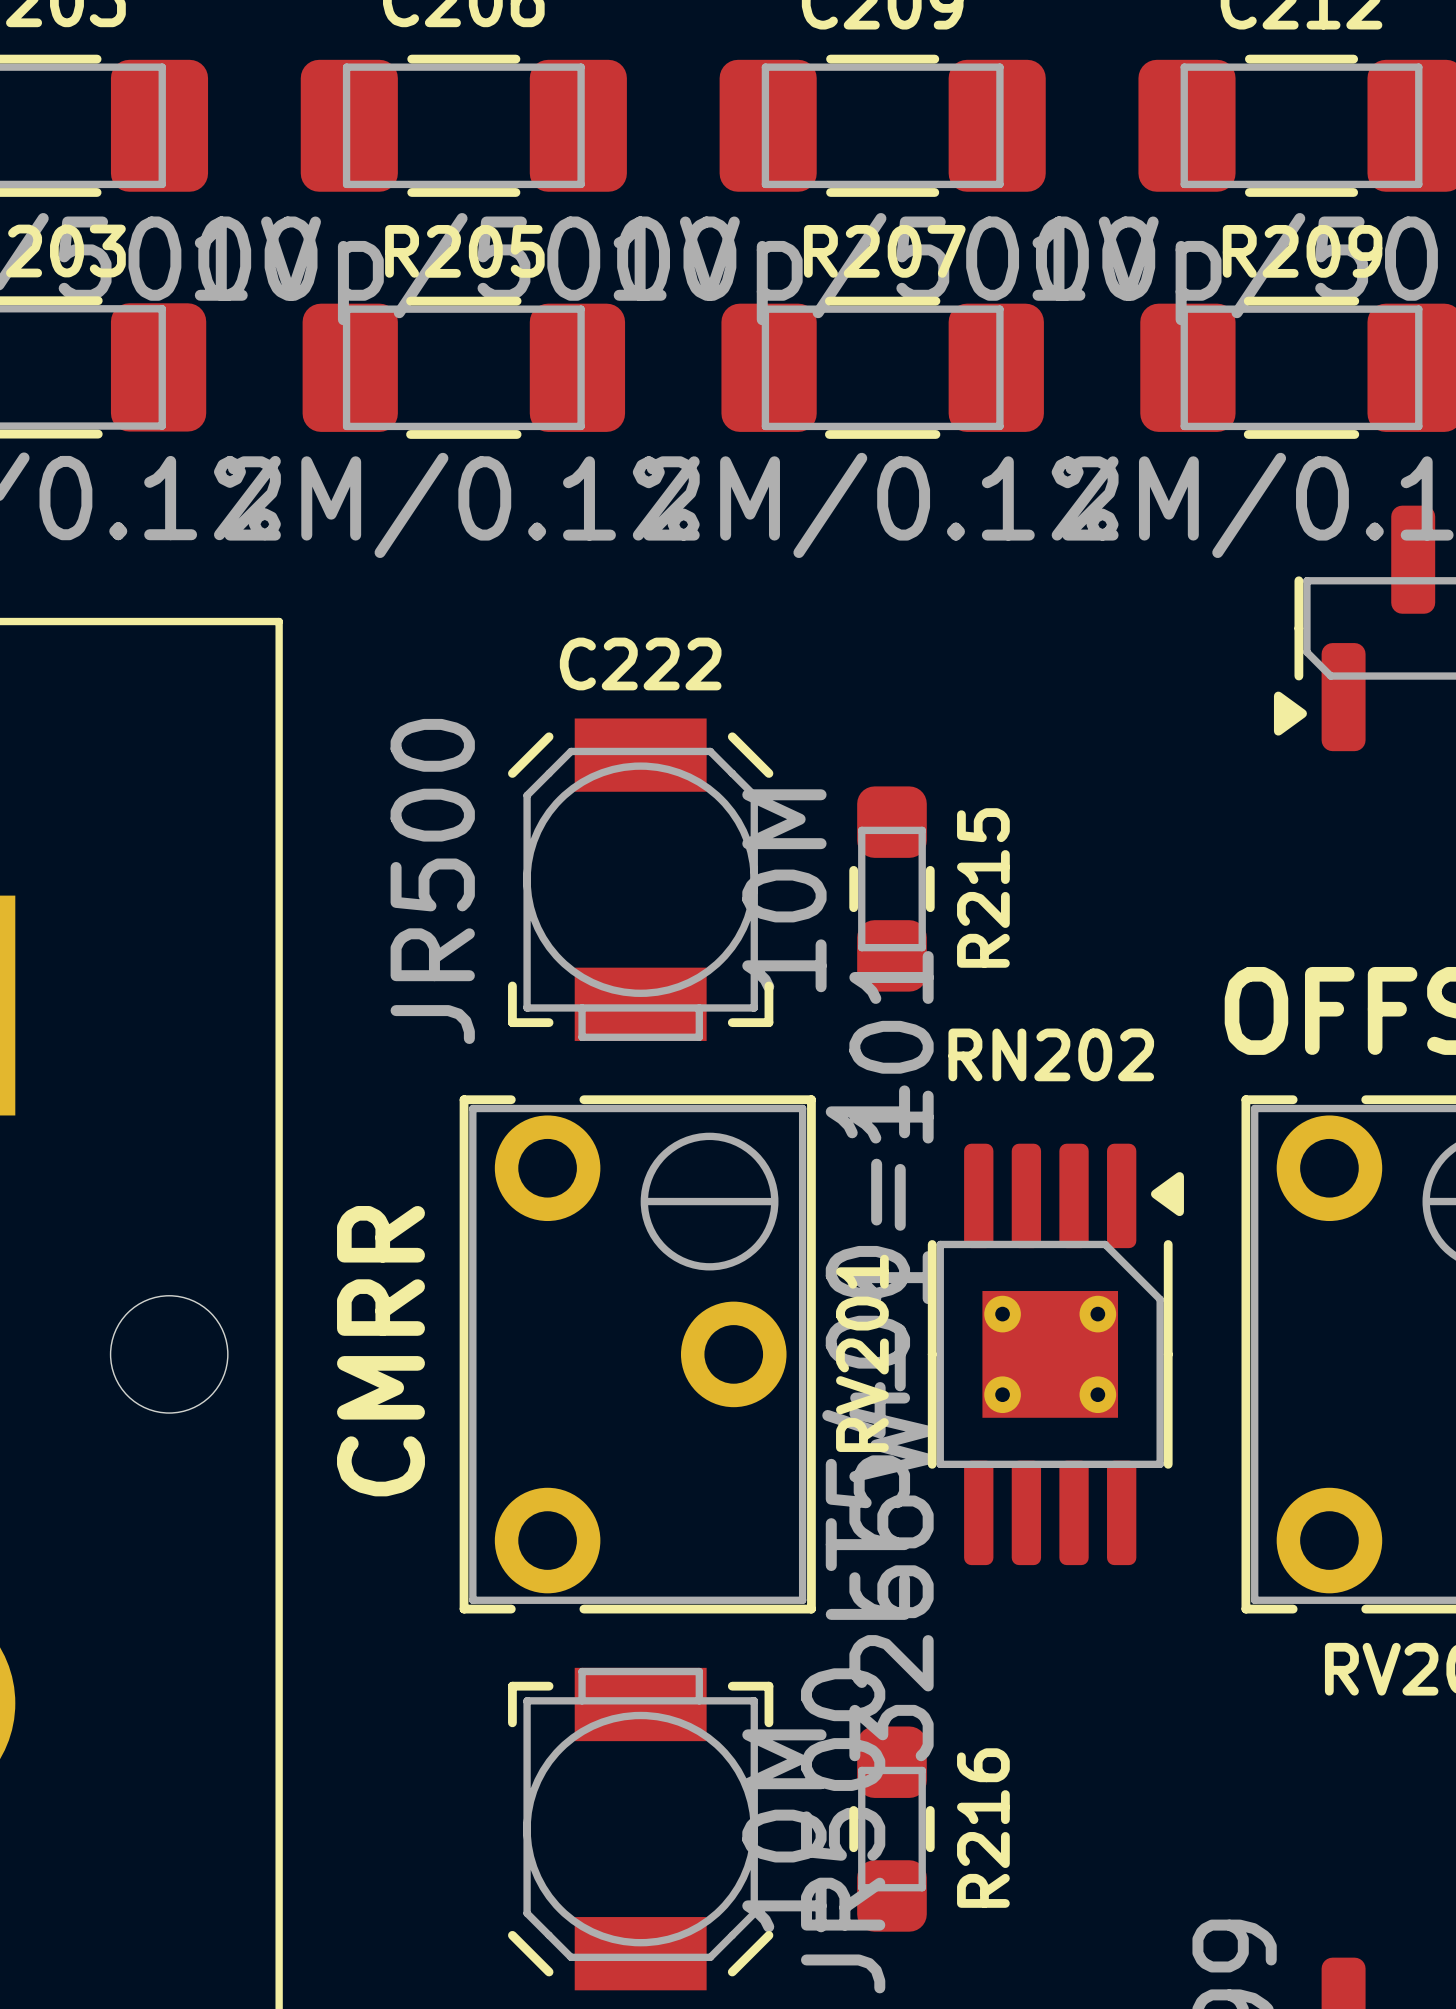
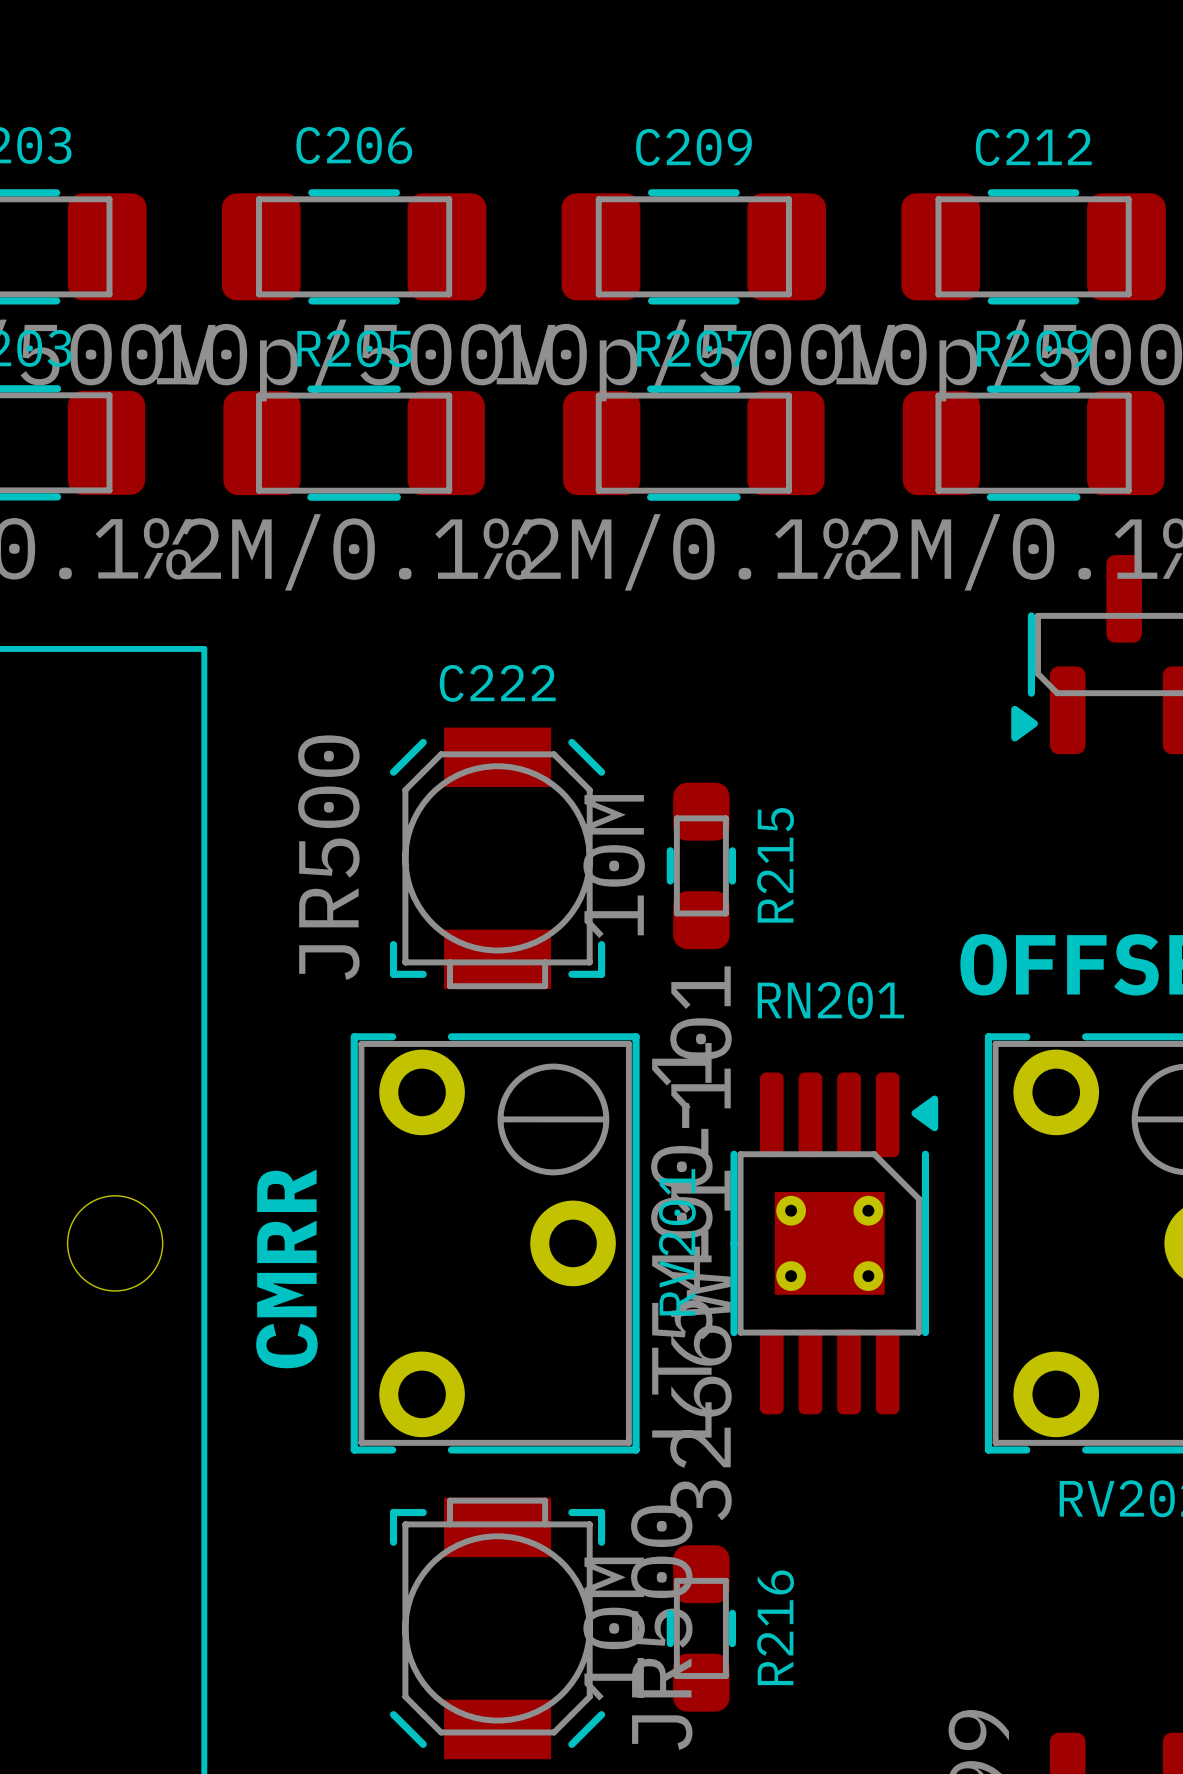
RN202 name: RN202 (1051, 1054) -> RN201 (830, 1000)

